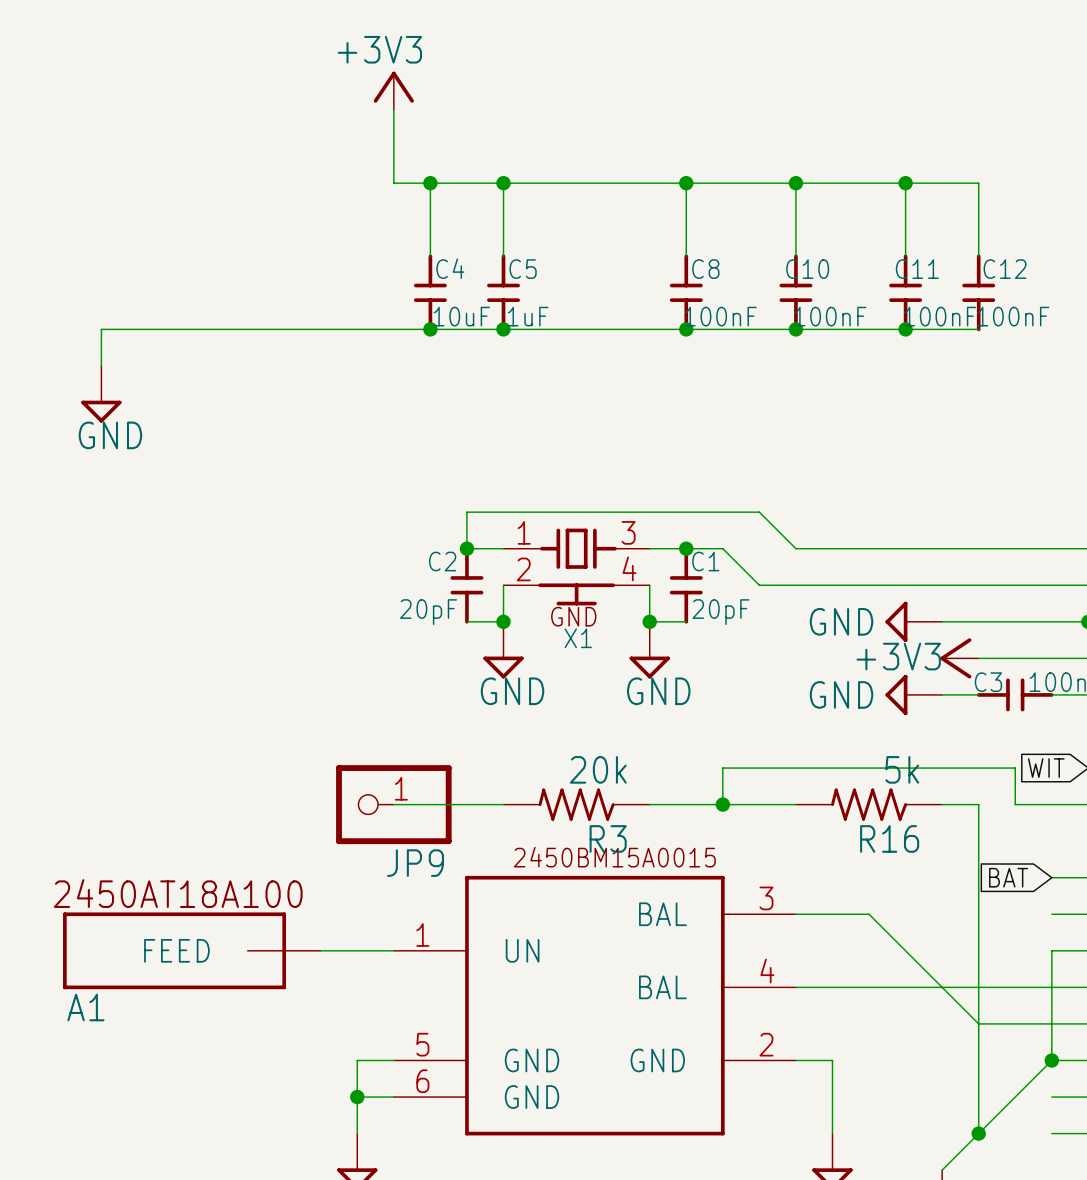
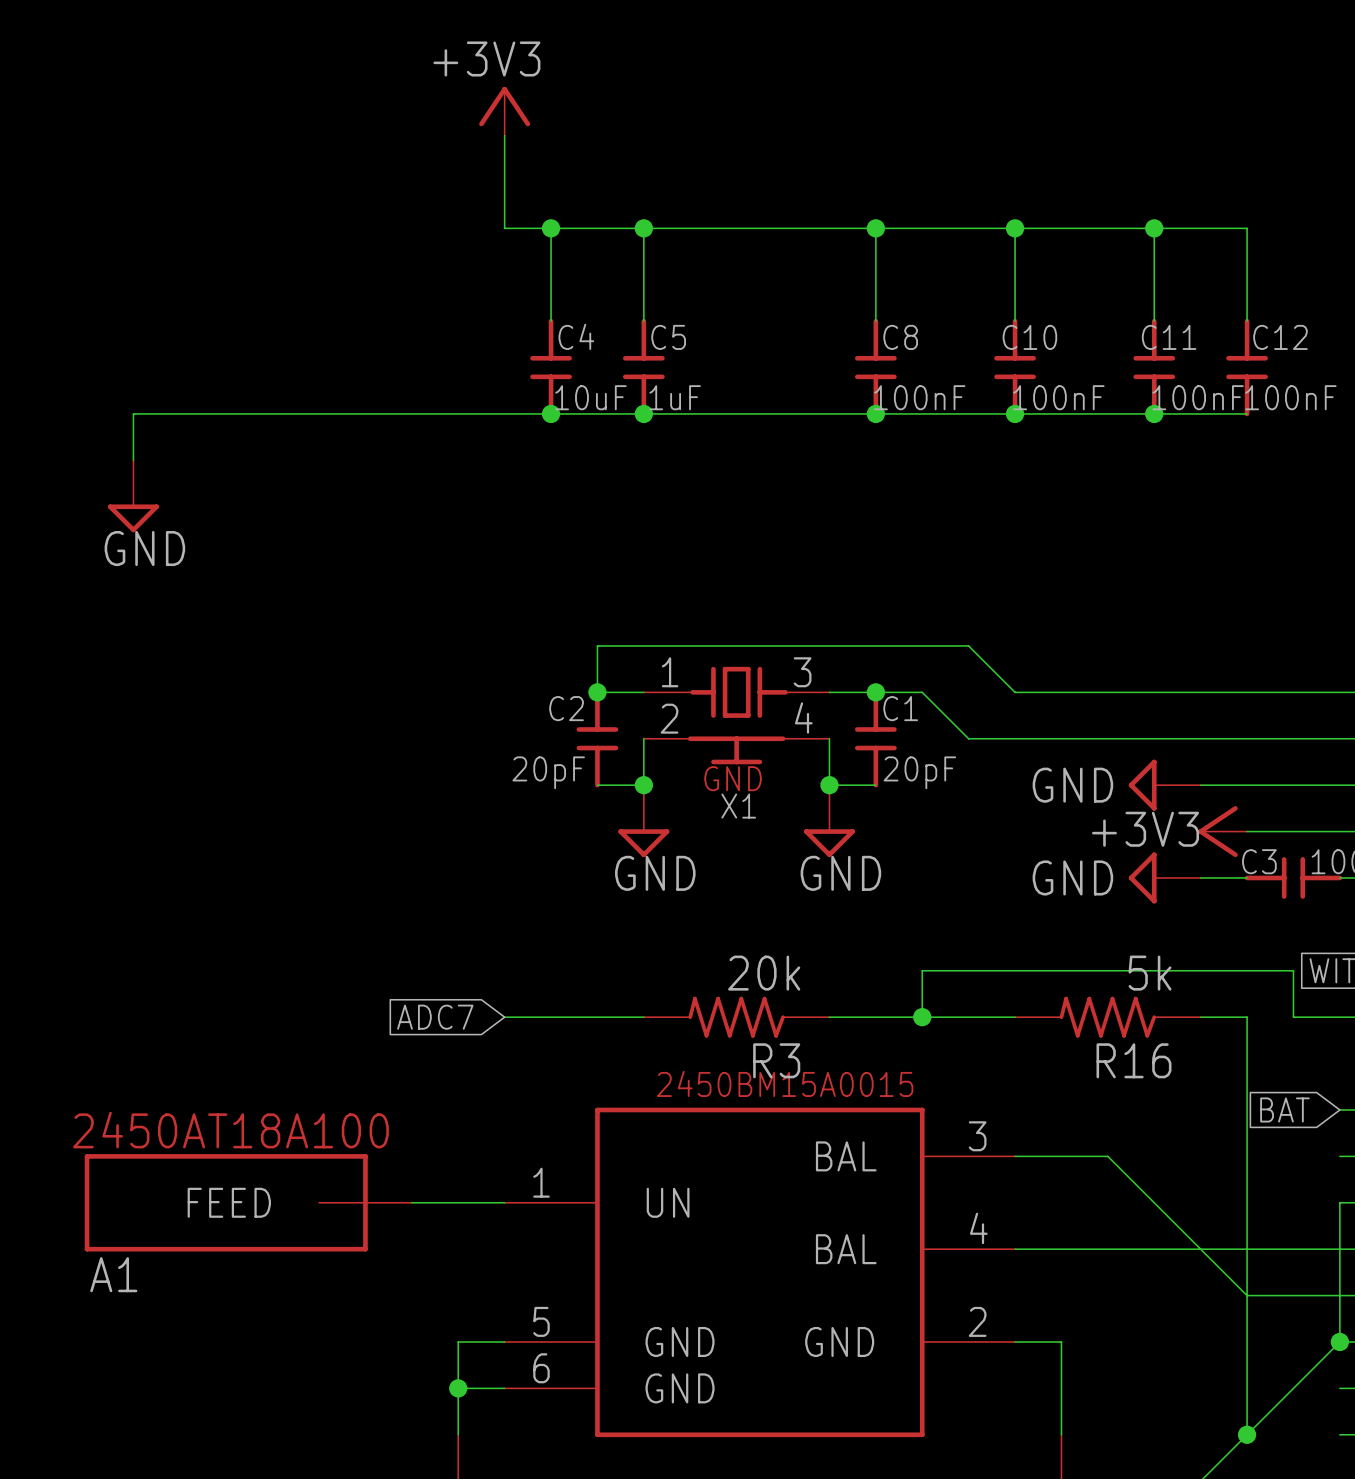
global label: none -> ADC7 (435, 1017)
JP9: (393, 804) -> none

